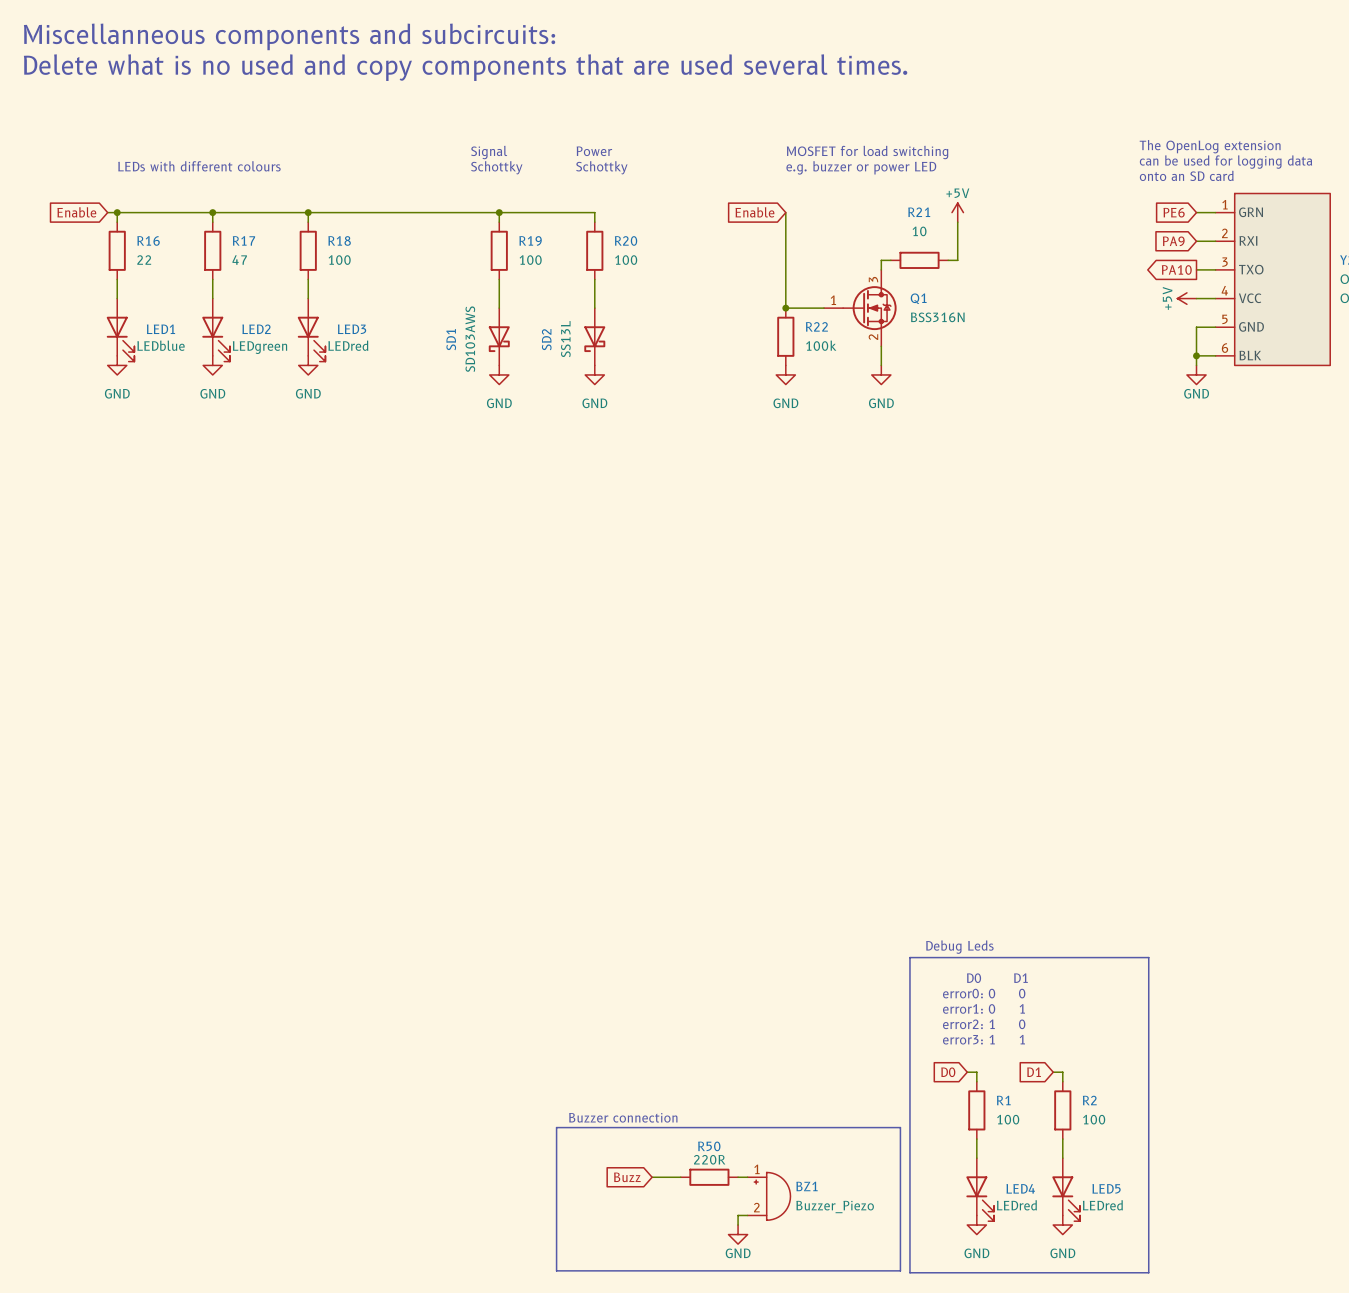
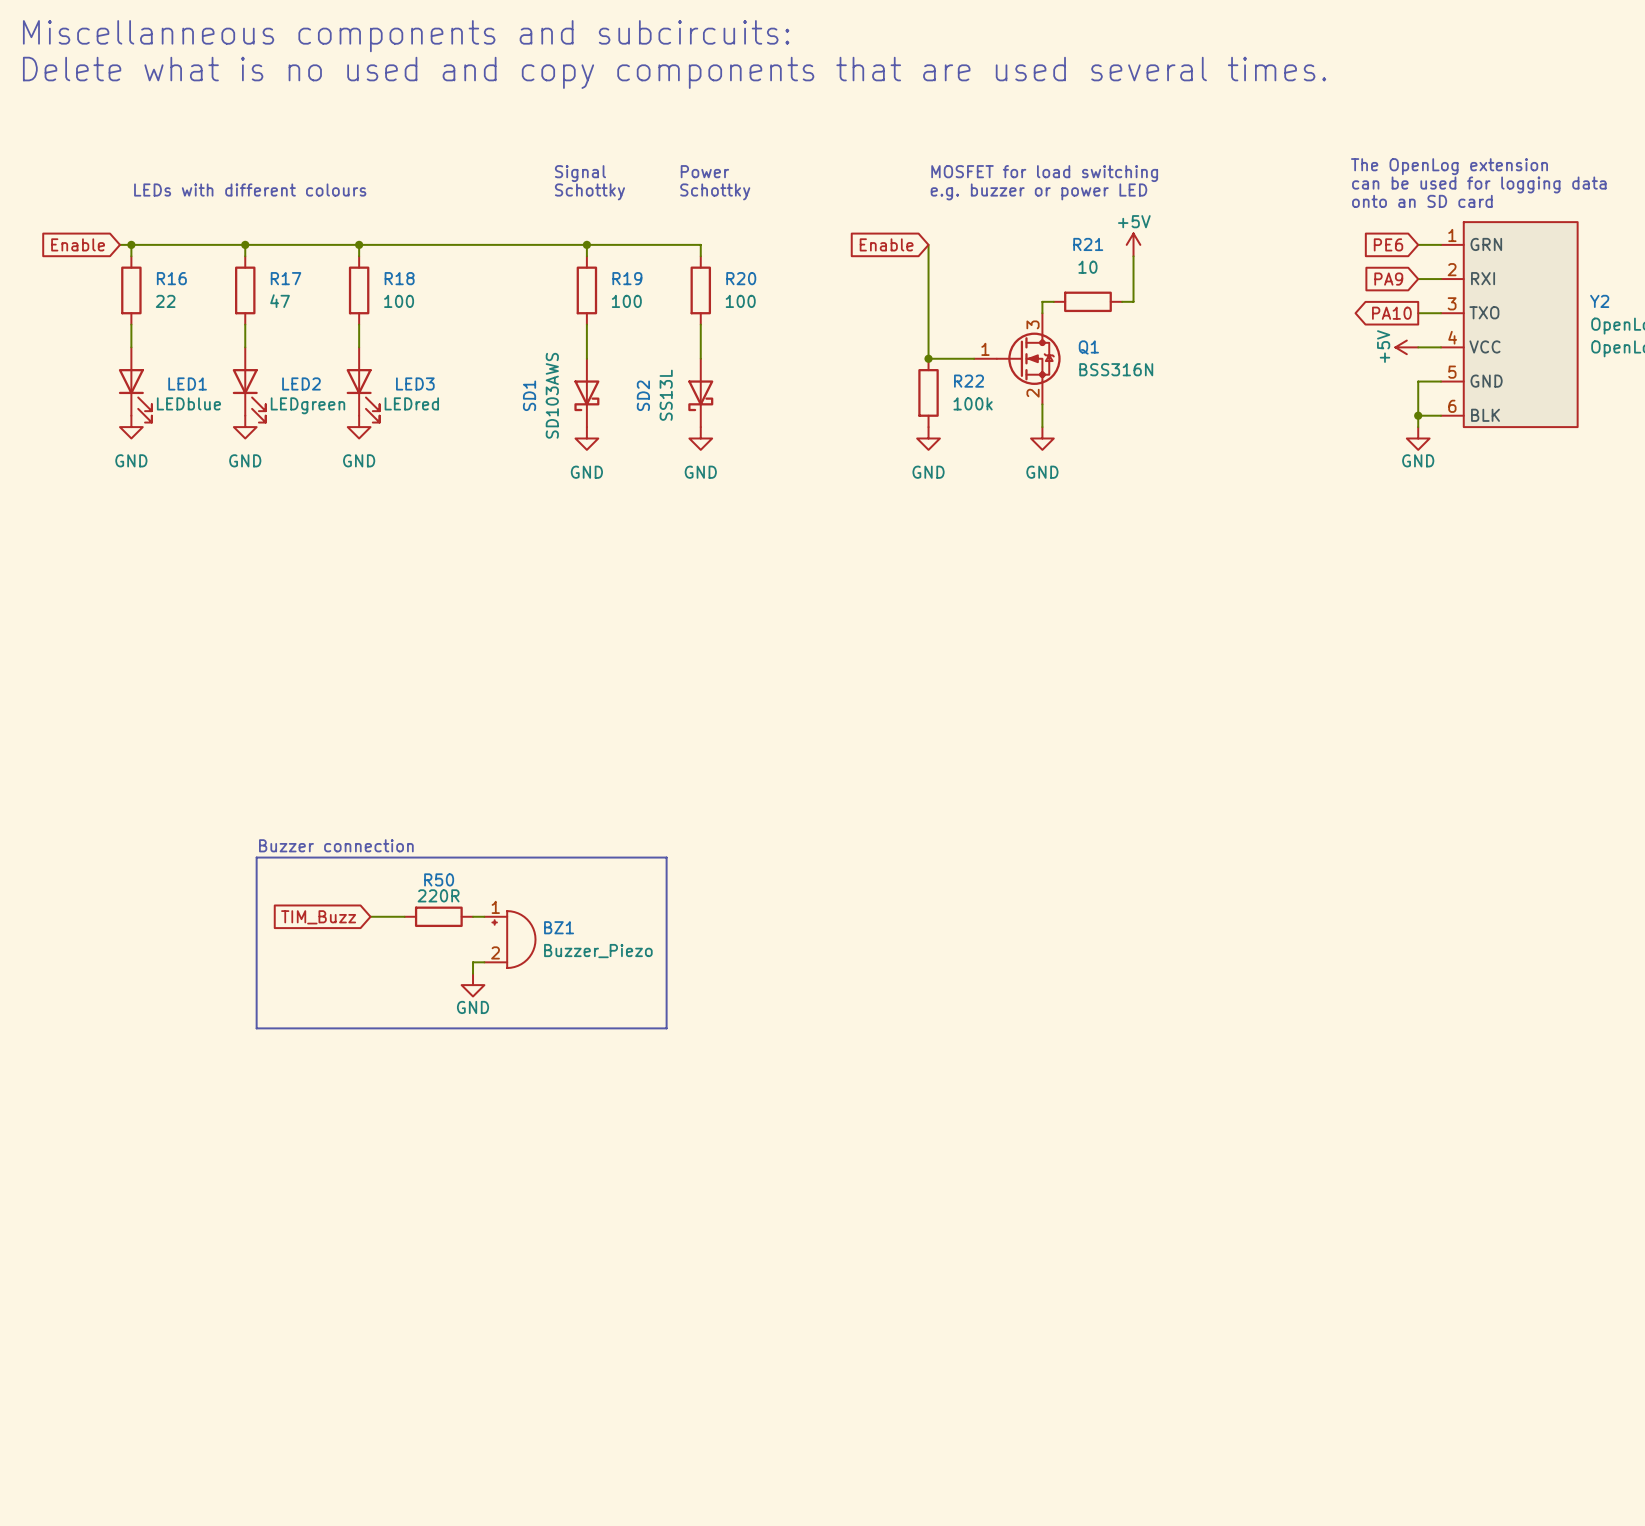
text: none -> Buzzer connection (336, 845)
line: none -> (256, 857) (666, 857) (666, 1028) (256, 1028) (256, 857)
wire: none -> (370, 916) (404, 916)
wire: none -> (473, 916) (484, 916)
global label: none -> TIM_Buzz (318, 917)
wire: none -> (484, 962) (473, 962) (473, 973)
power symbol: none -> GND (473, 985)
text: Debug Leds (959, 947) -> none
line: (909, 957) (1148, 957) (1148, 1272) (909, 1272) (909, 957) -> none
text: D0 D1 (997, 978) -> none
text: error0: 0 0 (984, 993) -> none
text: error1: 0 1 (984, 1008) -> none
text: error2: 1 0 (984, 1024) -> none
text: error3: 1 1 (984, 1039) -> none
global label: D0 (948, 1072) -> none
wire: (967, 1072) (976, 1072) (976, 1081) -> none
global label: D1 (1034, 1072) -> none
wire: (1053, 1072) (1062, 1072) (1062, 1081) -> none
R1: 100 (976, 1110) -> none
R2: 100 (1062, 1110) -> none
text: Buzzer connection (623, 1117) -> none
line: (556, 1127) (900, 1127) (900, 1270) (556, 1270) (556, 1127) -> none
wire: (976, 1139) (976, 1158) -> none
wire: (1062, 1139) (1062, 1158) -> none
global label: Buzz (627, 1177) -> none
wire: (652, 1177) (680, 1177) -> none
R50 position: (709, 1177) -> (438, 916)
wire: (738, 1177) (747, 1177) -> none
LED4: LEDred (980, 1189) -> none
LED5: LEDred (1066, 1189) -> none
BZ1 position: (769, 1196) -> (509, 939)
wire: (747, 1215) (738, 1215) (738, 1225) -> none
power symbol: GND (976, 1225) -> none
power symbol: GND (1062, 1225) -> none
power symbol: GND (738, 1234) -> none

